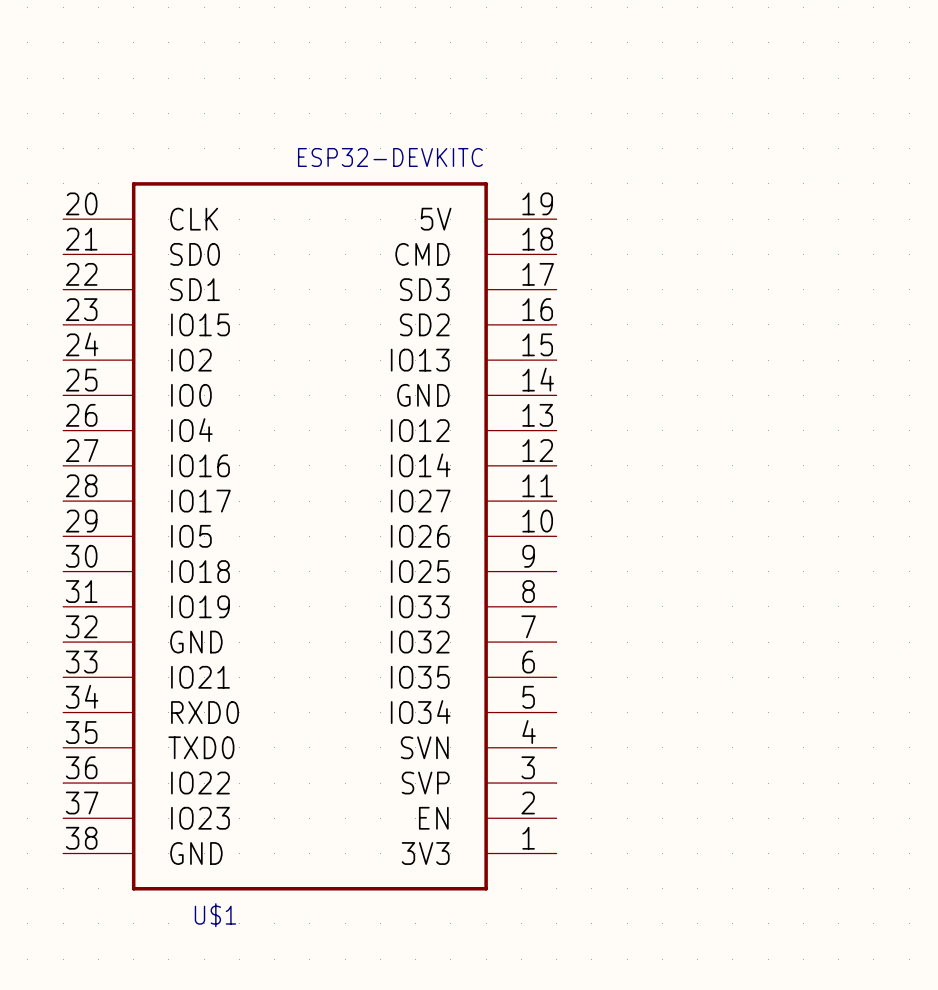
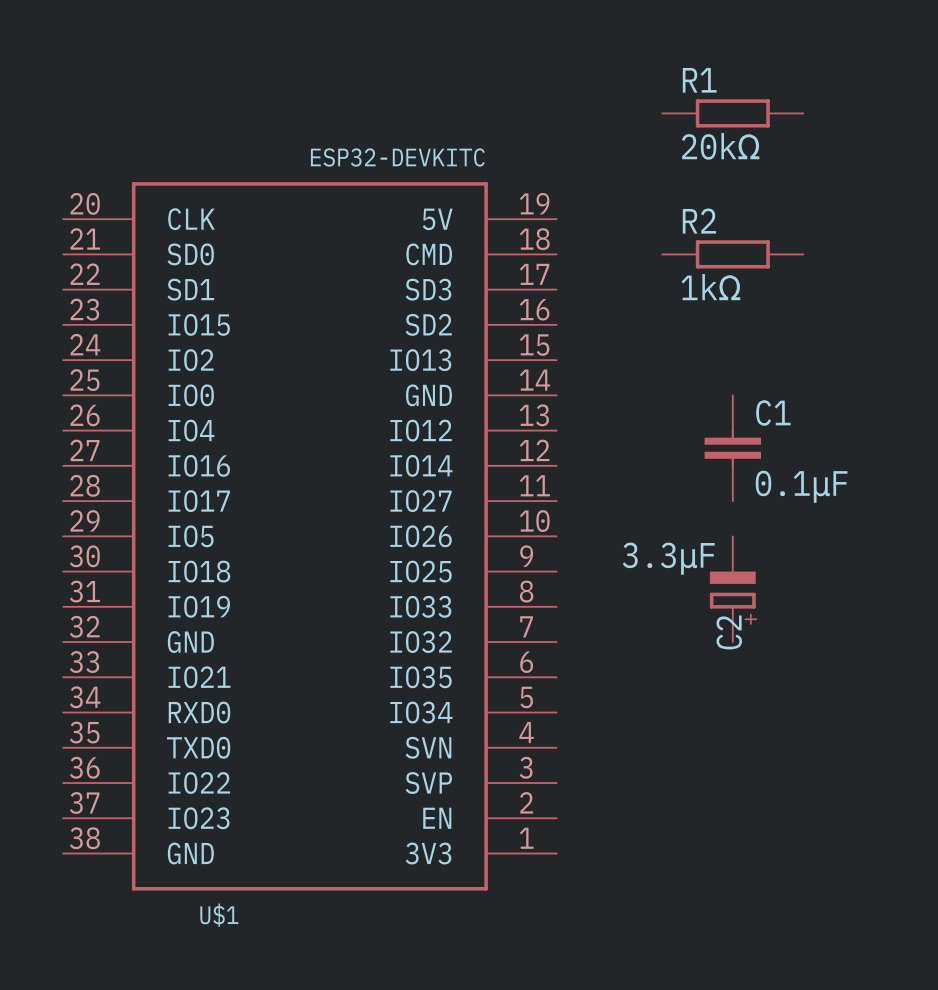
R1: none -> 20kΩ (732, 113)
R2: none -> 1kΩ (732, 254)
C1: none -> 0.1μF (732, 448)
C2: none -> 3.3μF (732, 589)

